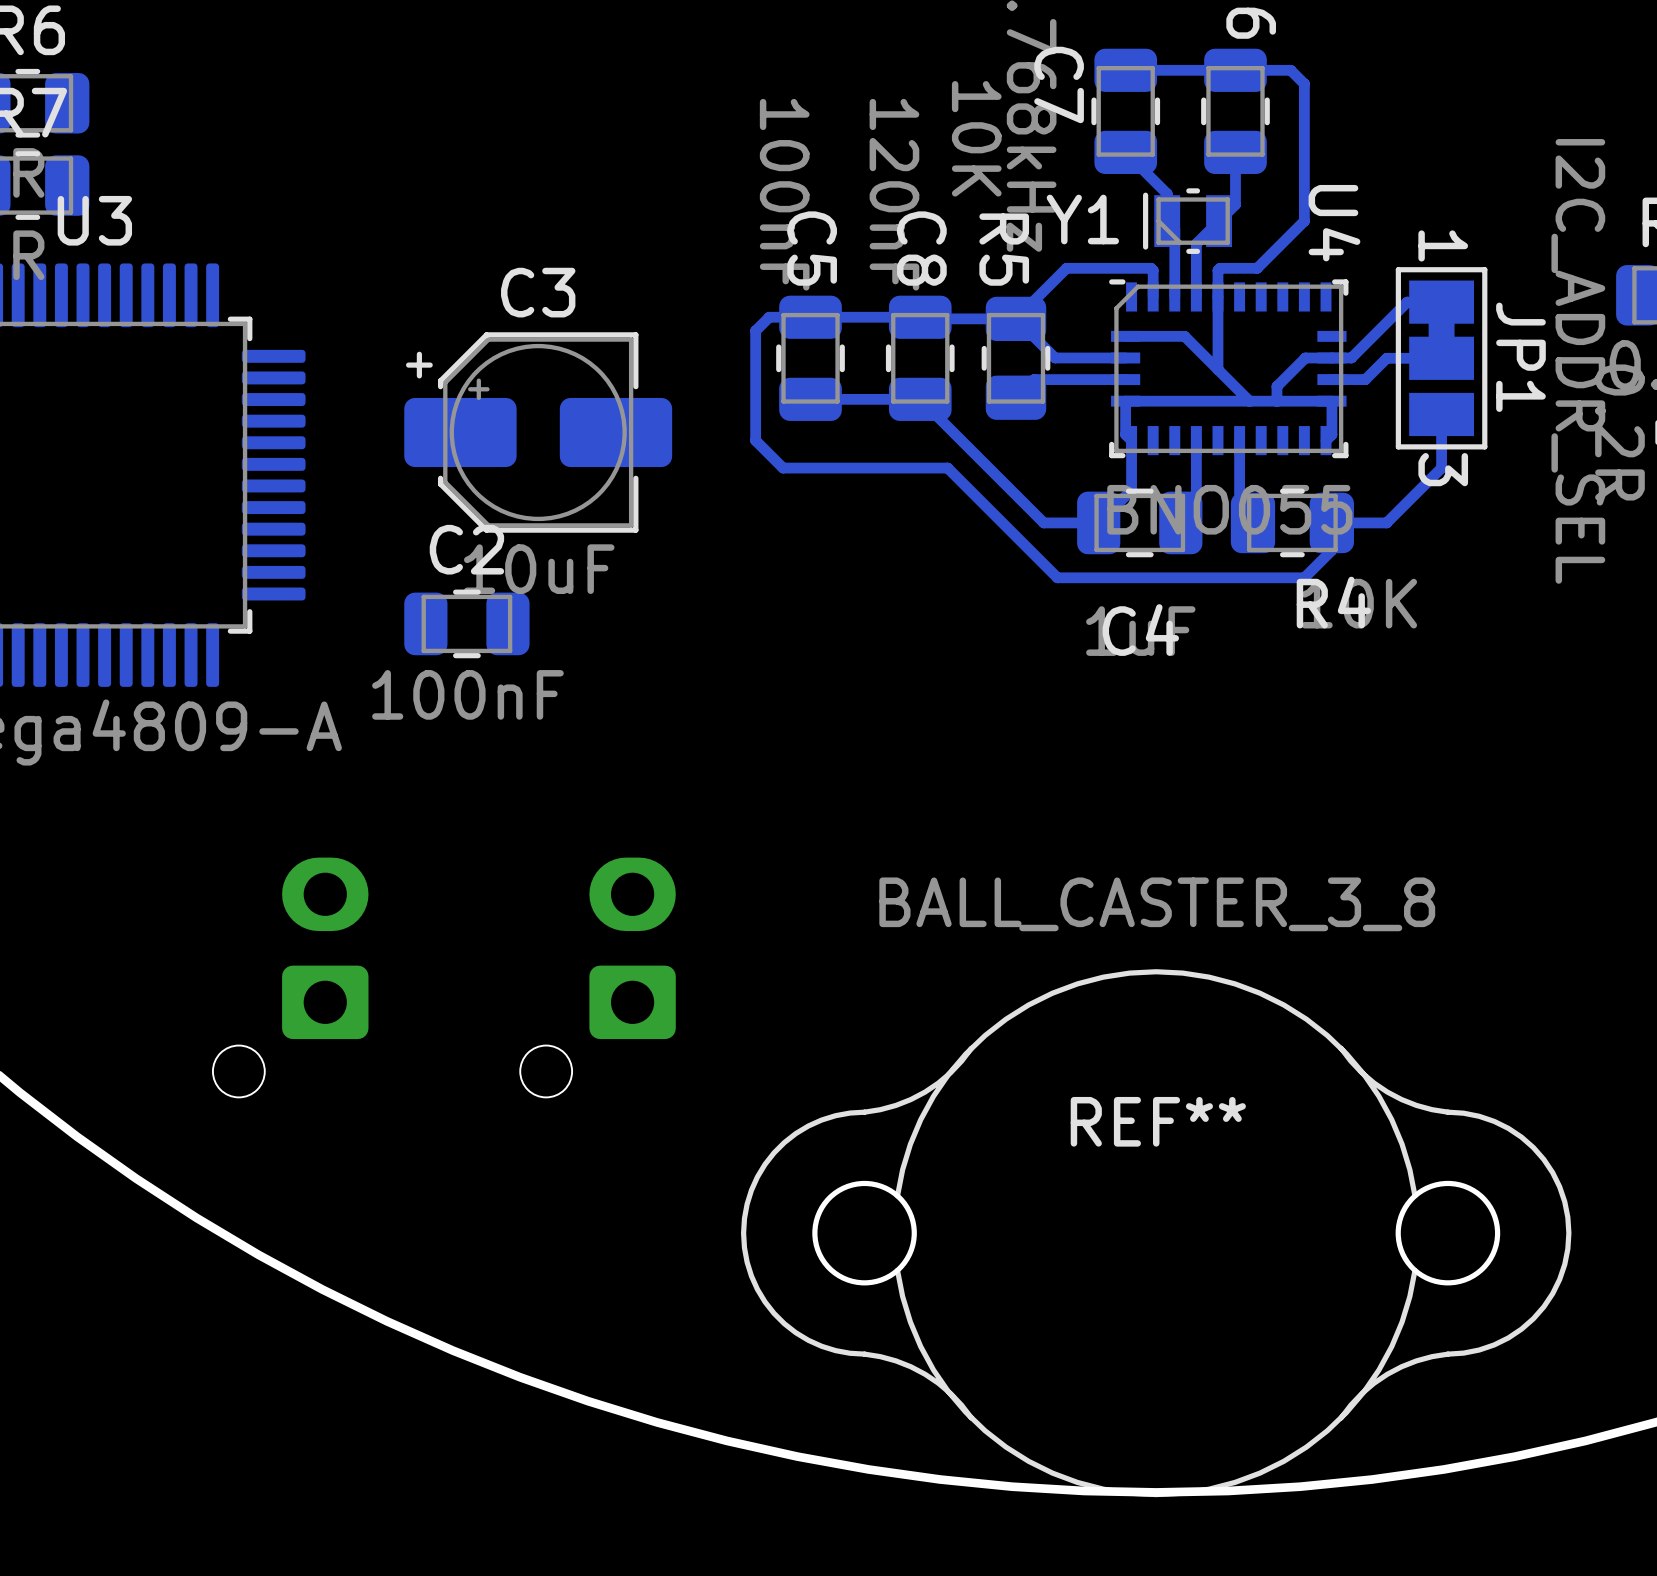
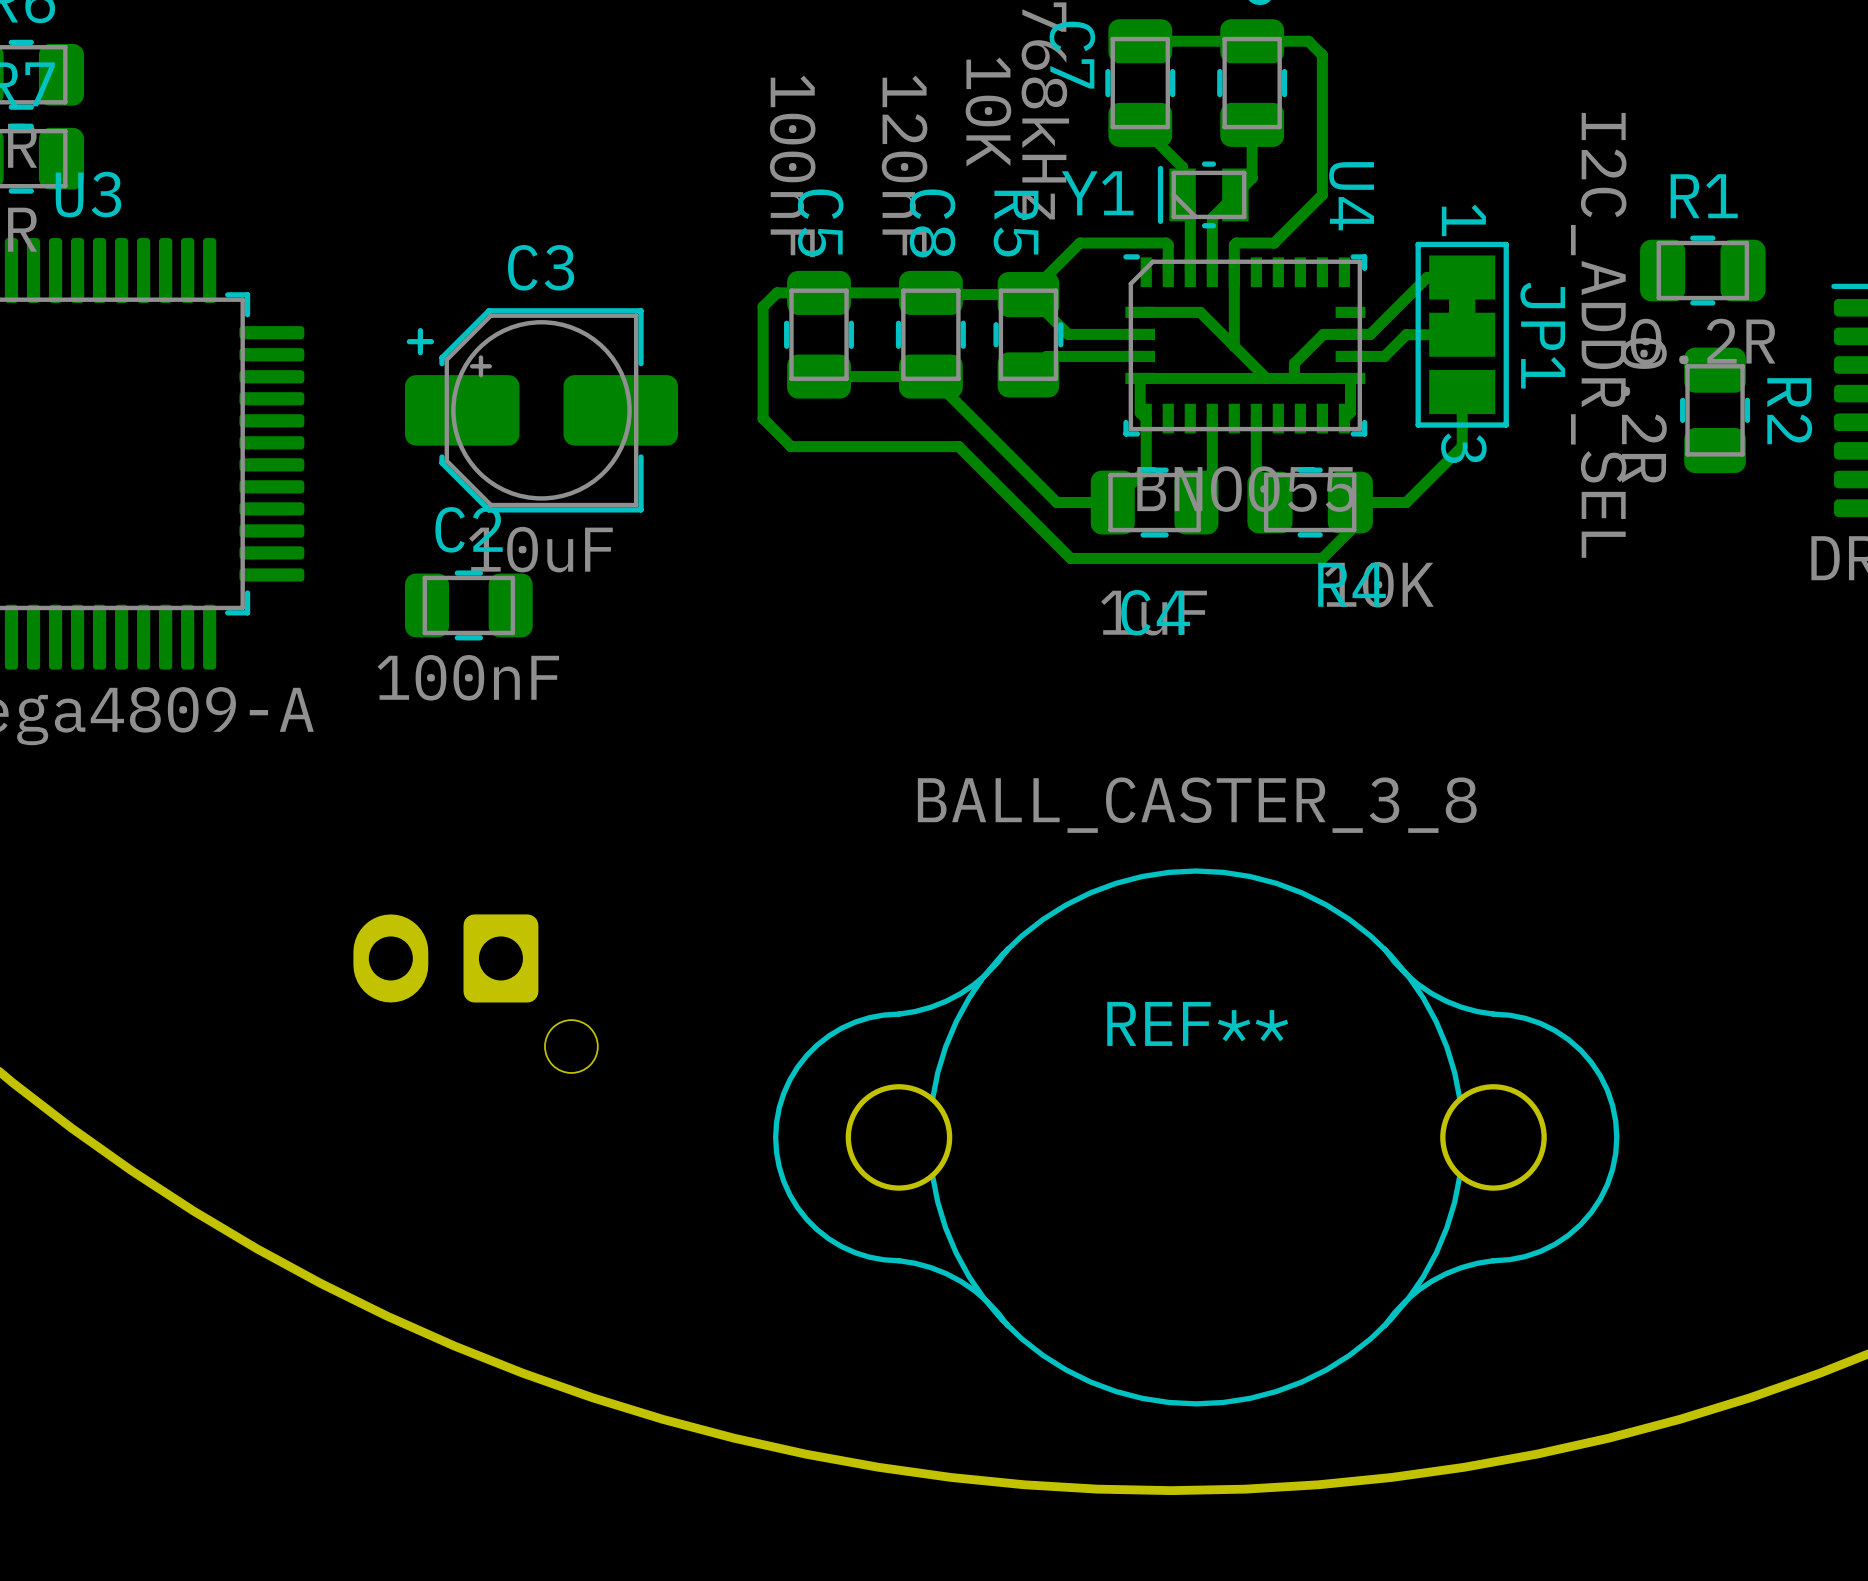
part: (290, 977) -> none
part: (598, 977) -> none
part: none -> (475, 993)
REF** position: (1156, 1233) -> (1196, 1137)

